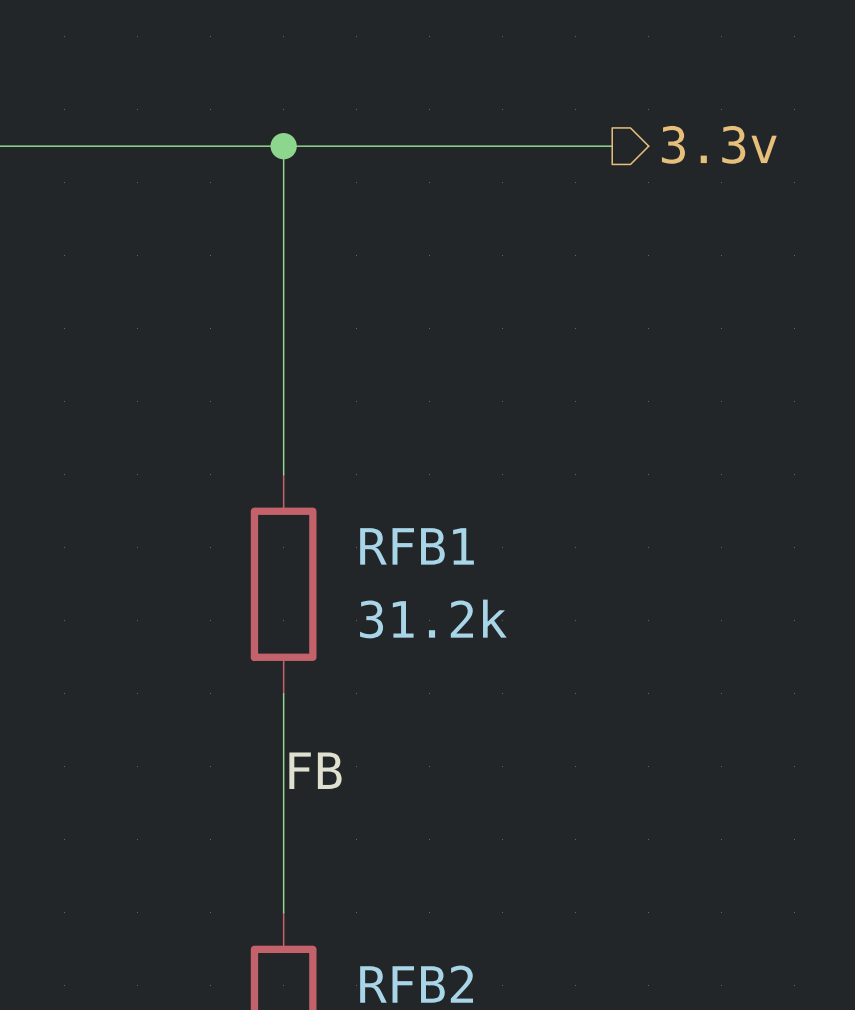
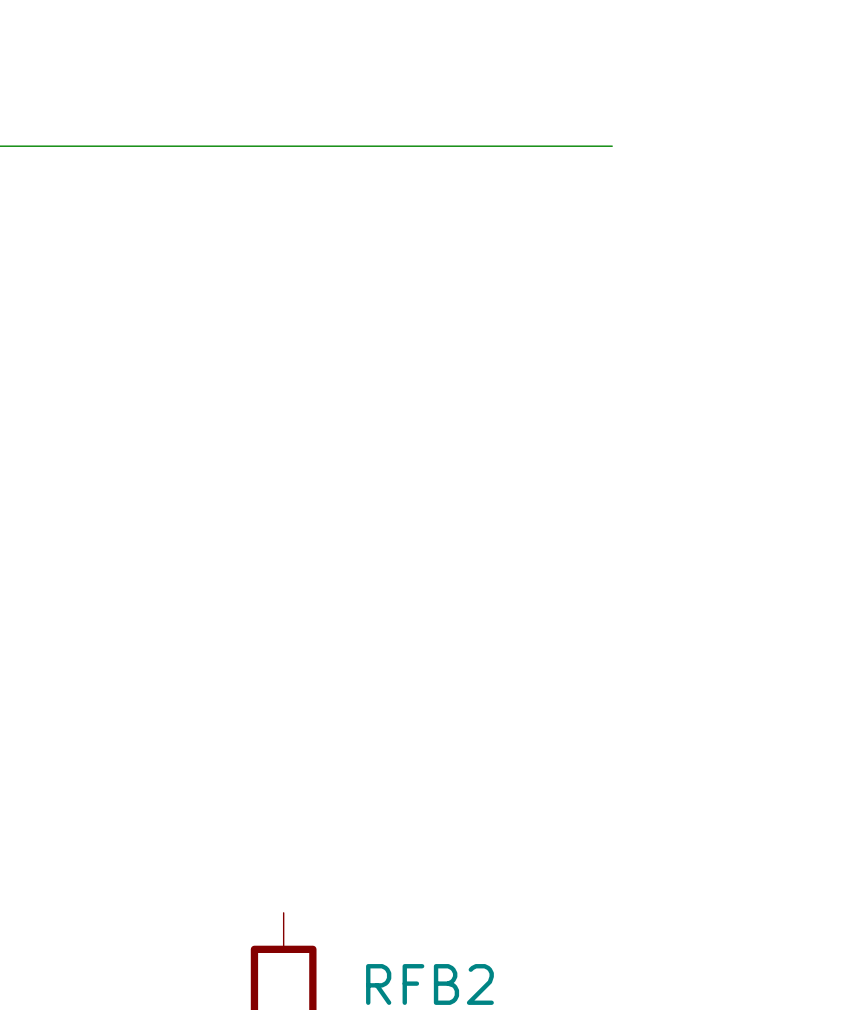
hierarchical label: 3.3v (719, 144) -> none
wire: (283, 146) (283, 474) -> none
junction: (283, 146) -> none
RFB1: 31.2k (283, 584) -> none
wire: (283, 693) (283, 912) -> none
label: FB (315, 770) -> none

